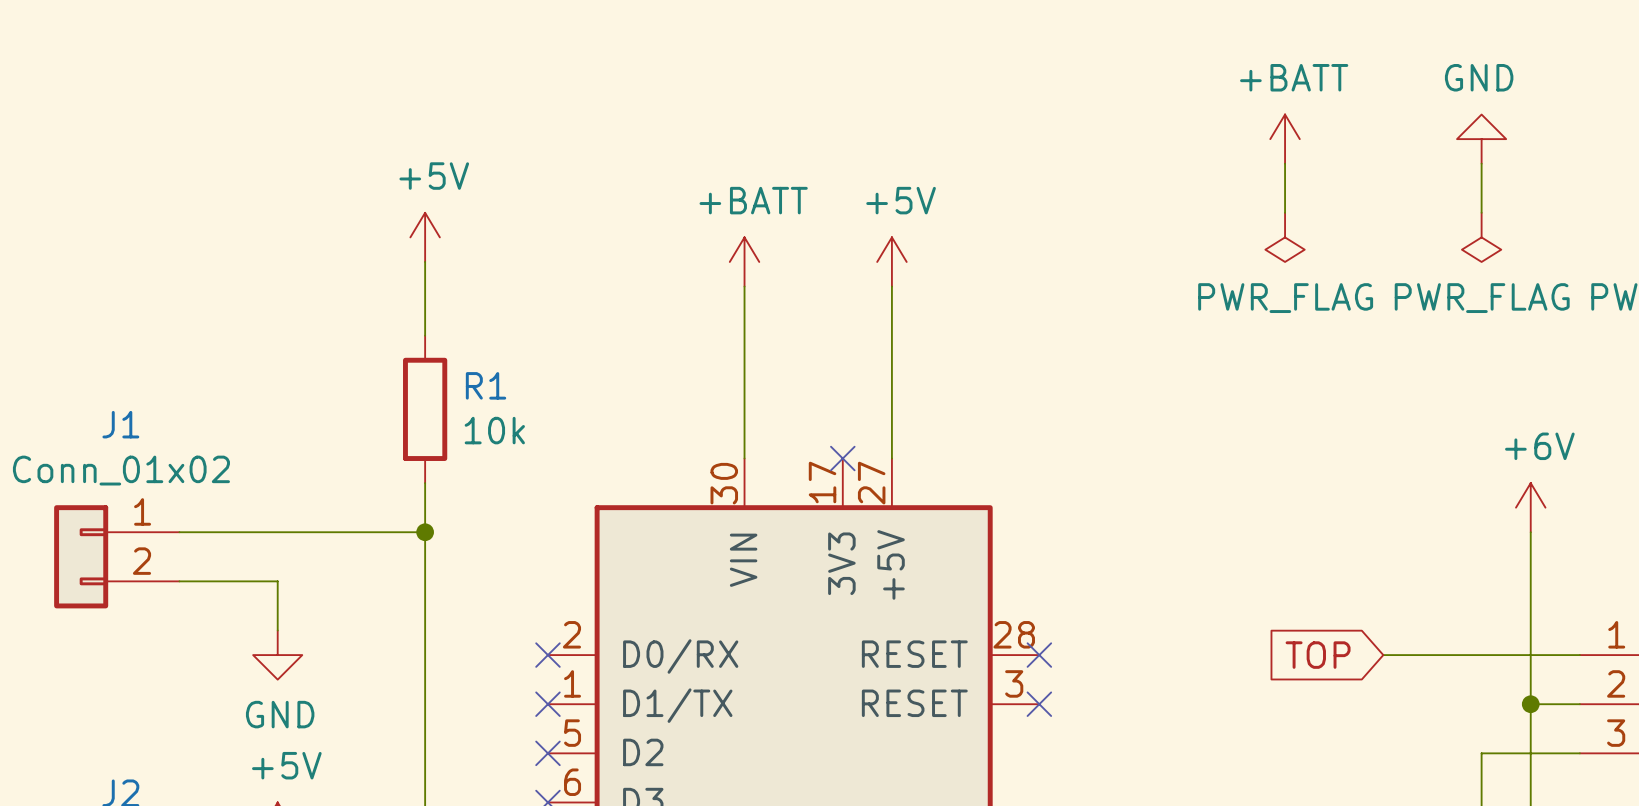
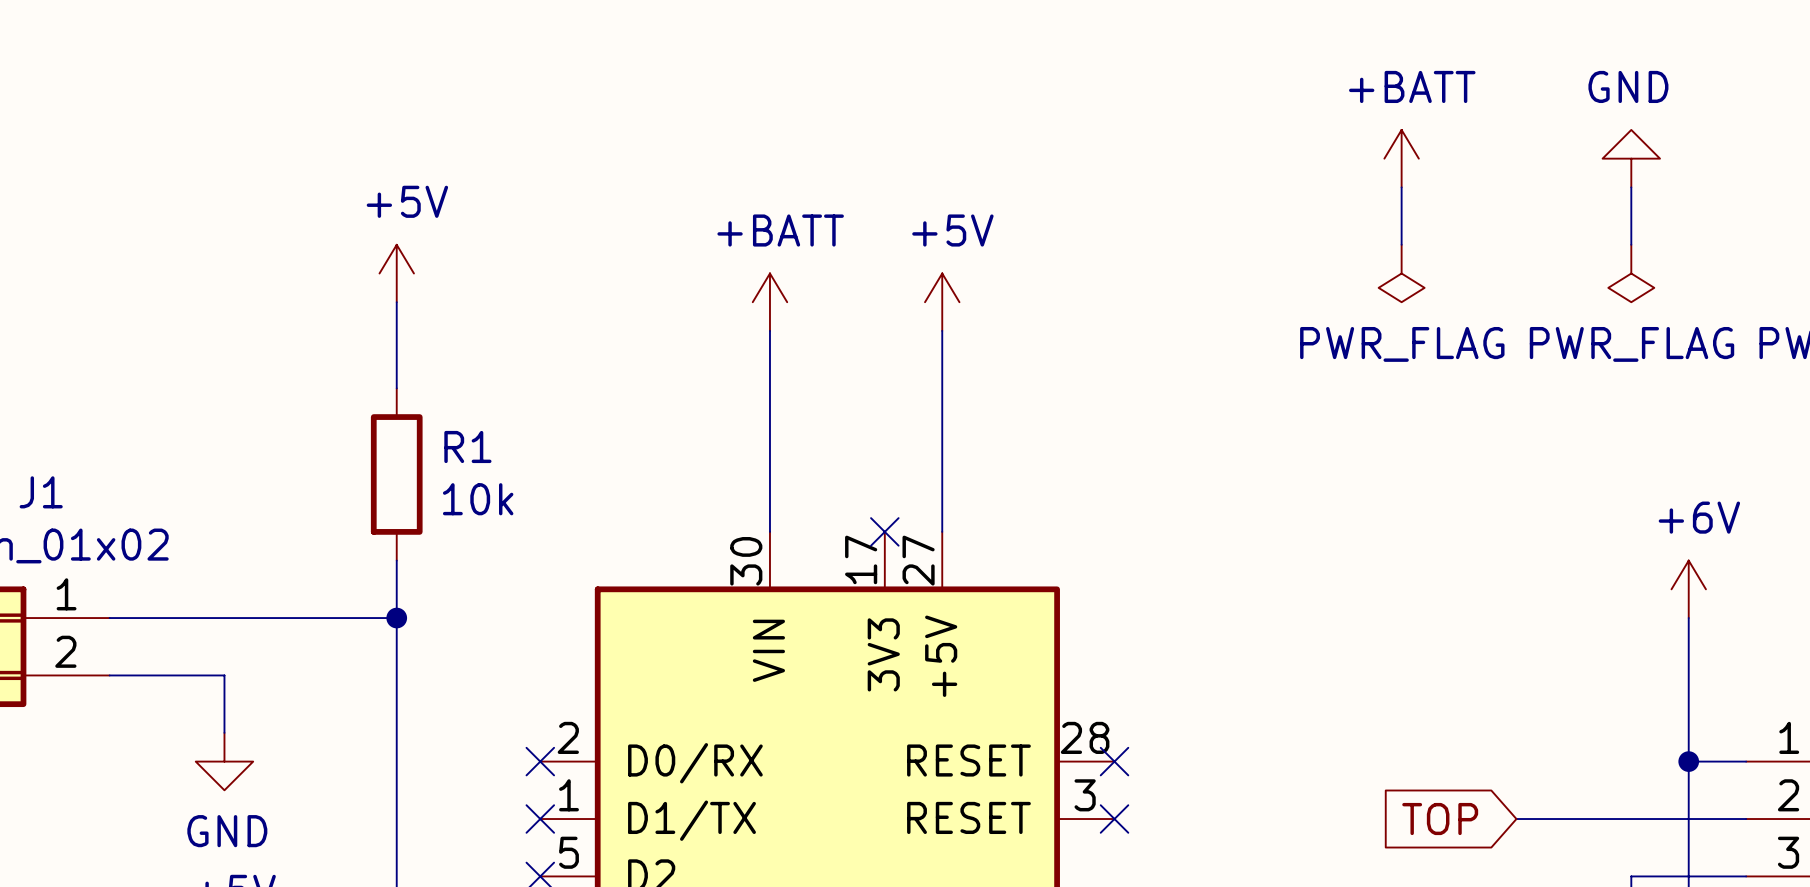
global label position: TOP (1318, 655) -> TOP (1440, 819)
wire: (1383, 655) (1530, 655) -> (1516, 819) (1688, 819)
junction position: (1530, 704) -> (1688, 761)

